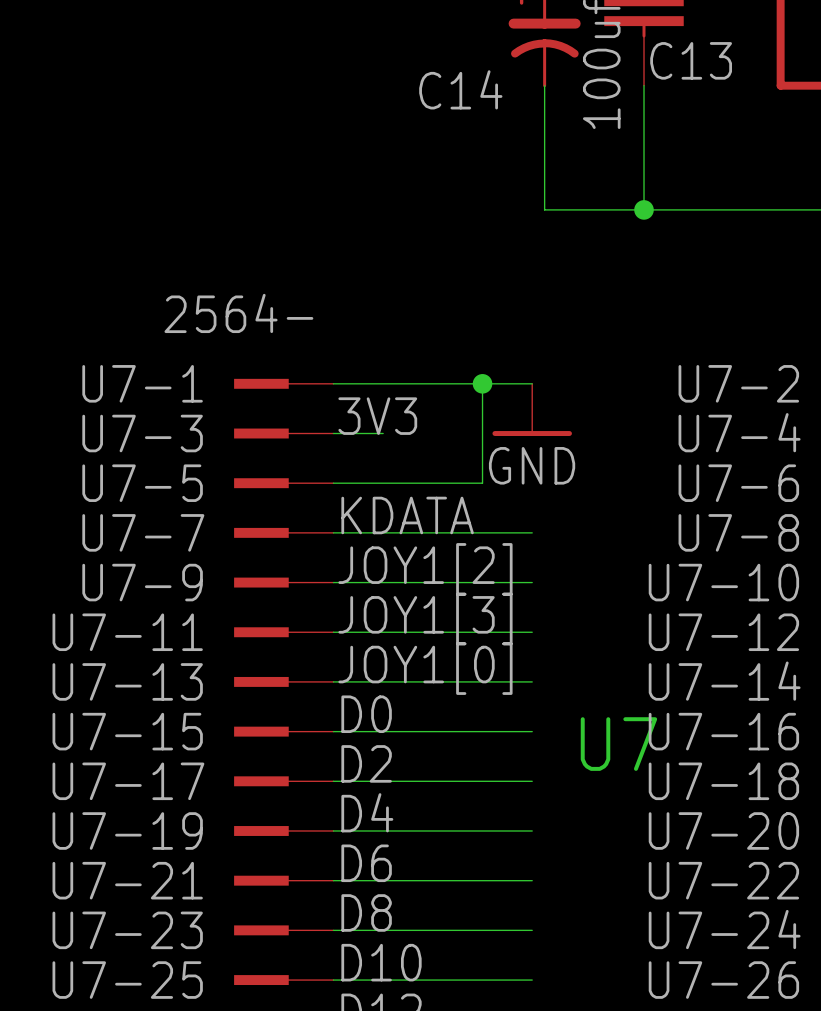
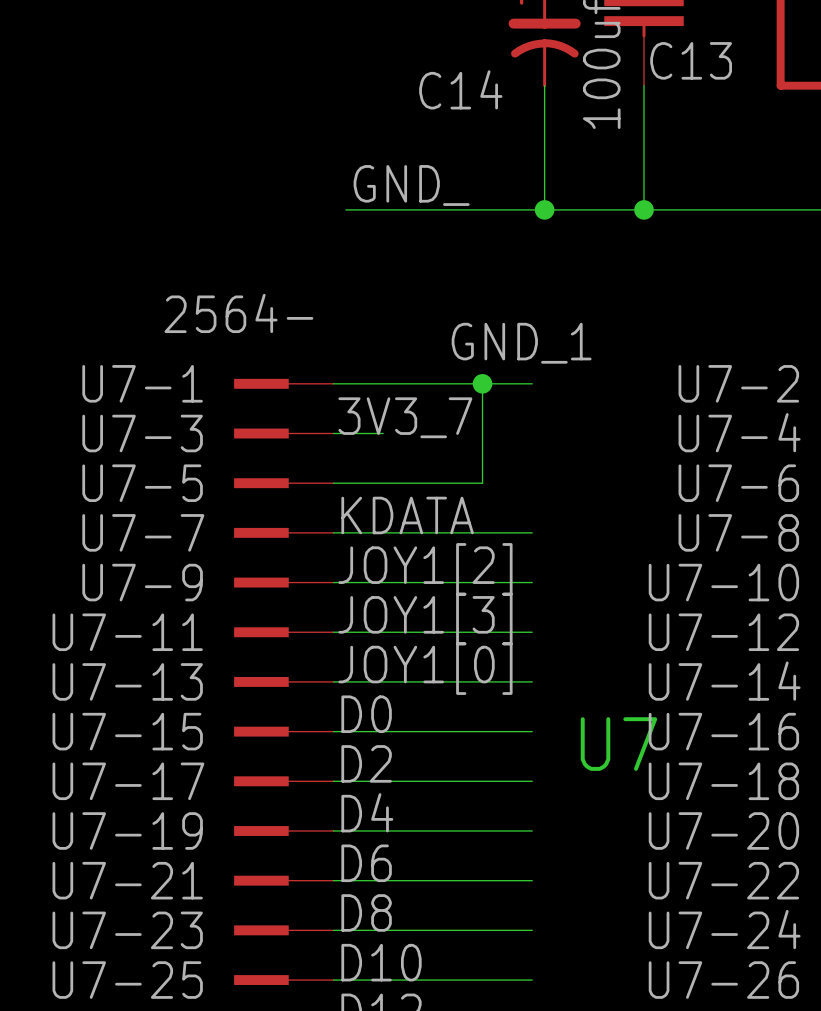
label: none -> GND_ (411, 185)
wire: none -> (345, 209) (544, 209)
junction: none -> (544, 209)
label: none -> GND_1 (521, 343)
power symbol: GND (532, 409) -> none
label: 3V3 (377, 416) -> 3V3_7 (405, 417)

